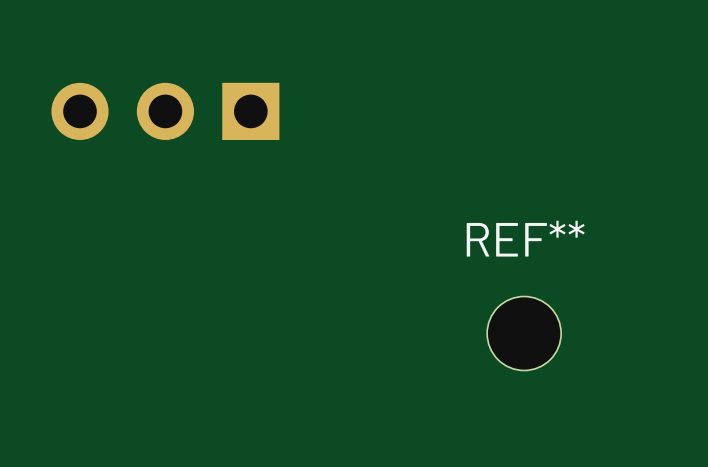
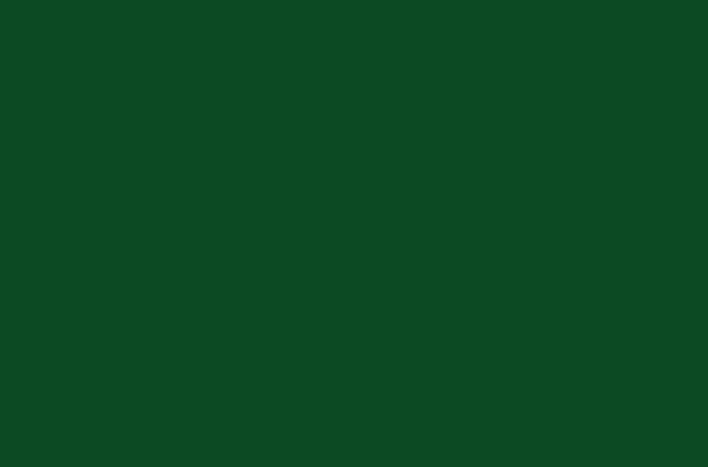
part: (165, 111) -> none
REF**: (524, 333) -> none

